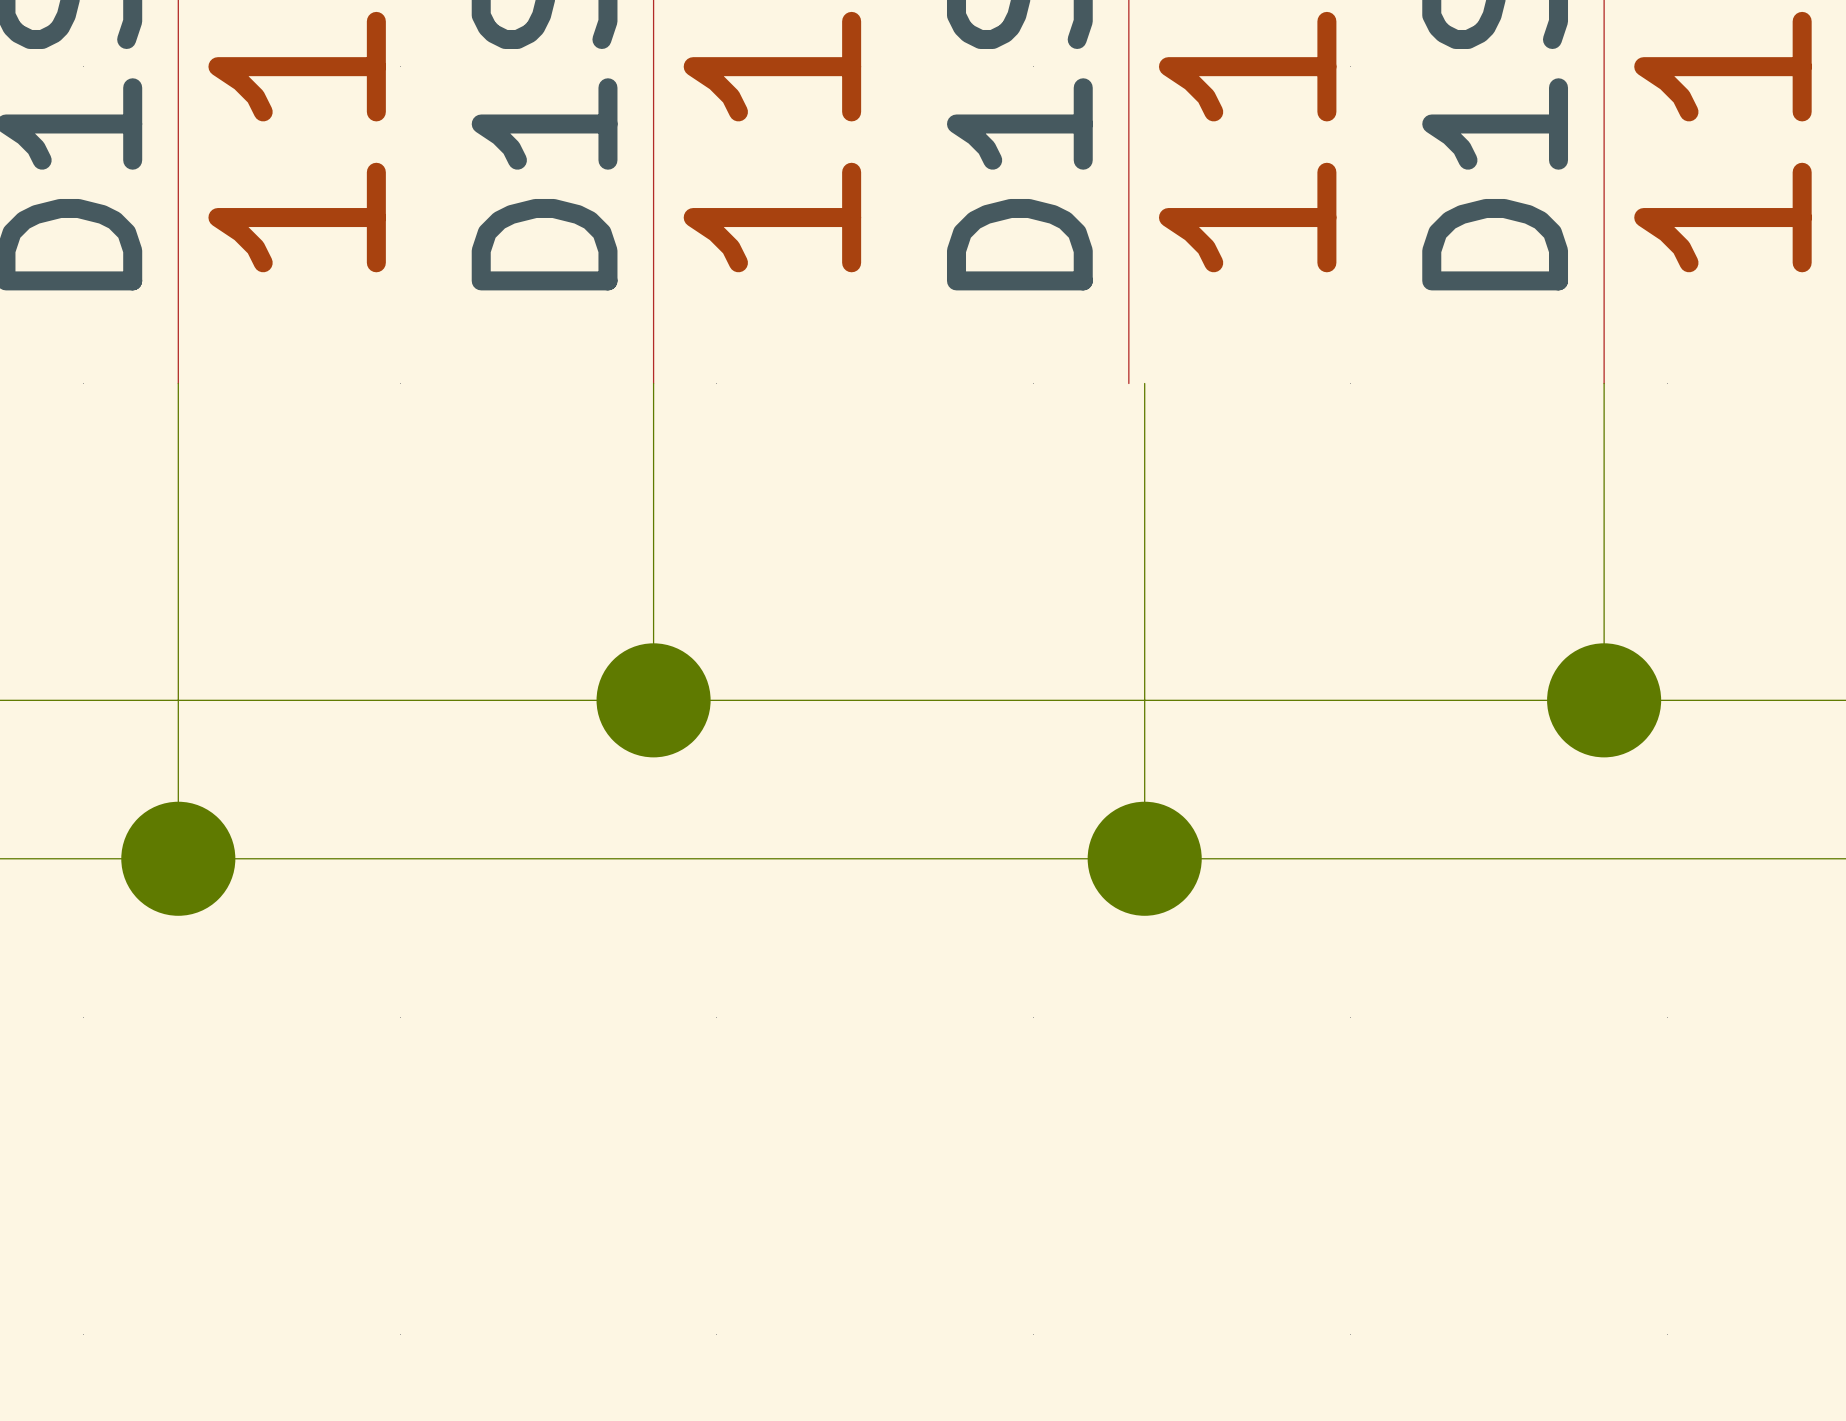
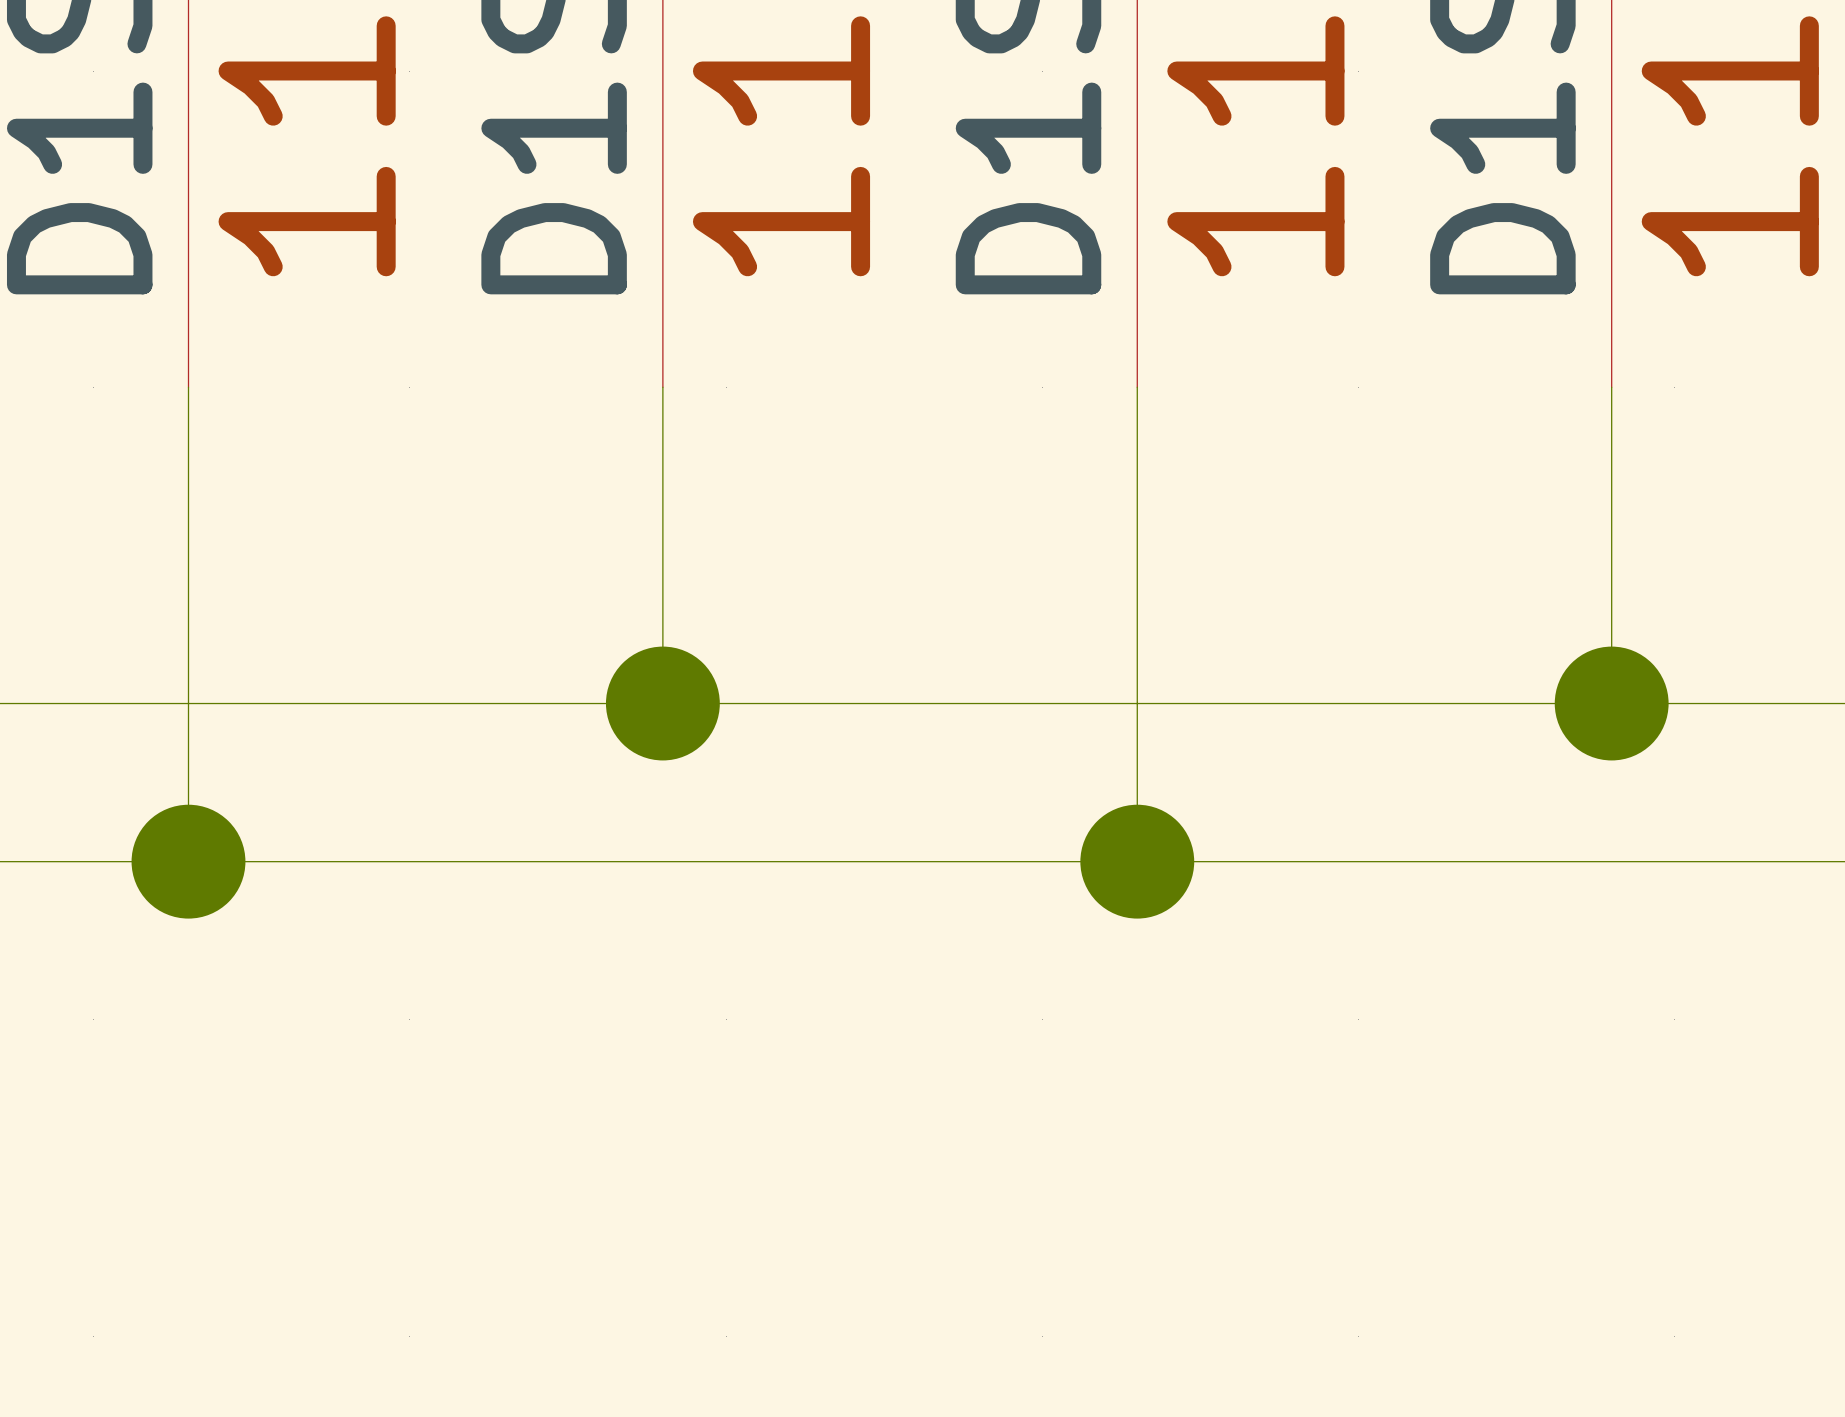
wire: (1144, 383) (1144, 858) -> (1137, 387) (1137, 861)
junction position: (1144, 858) -> (1137, 861)

